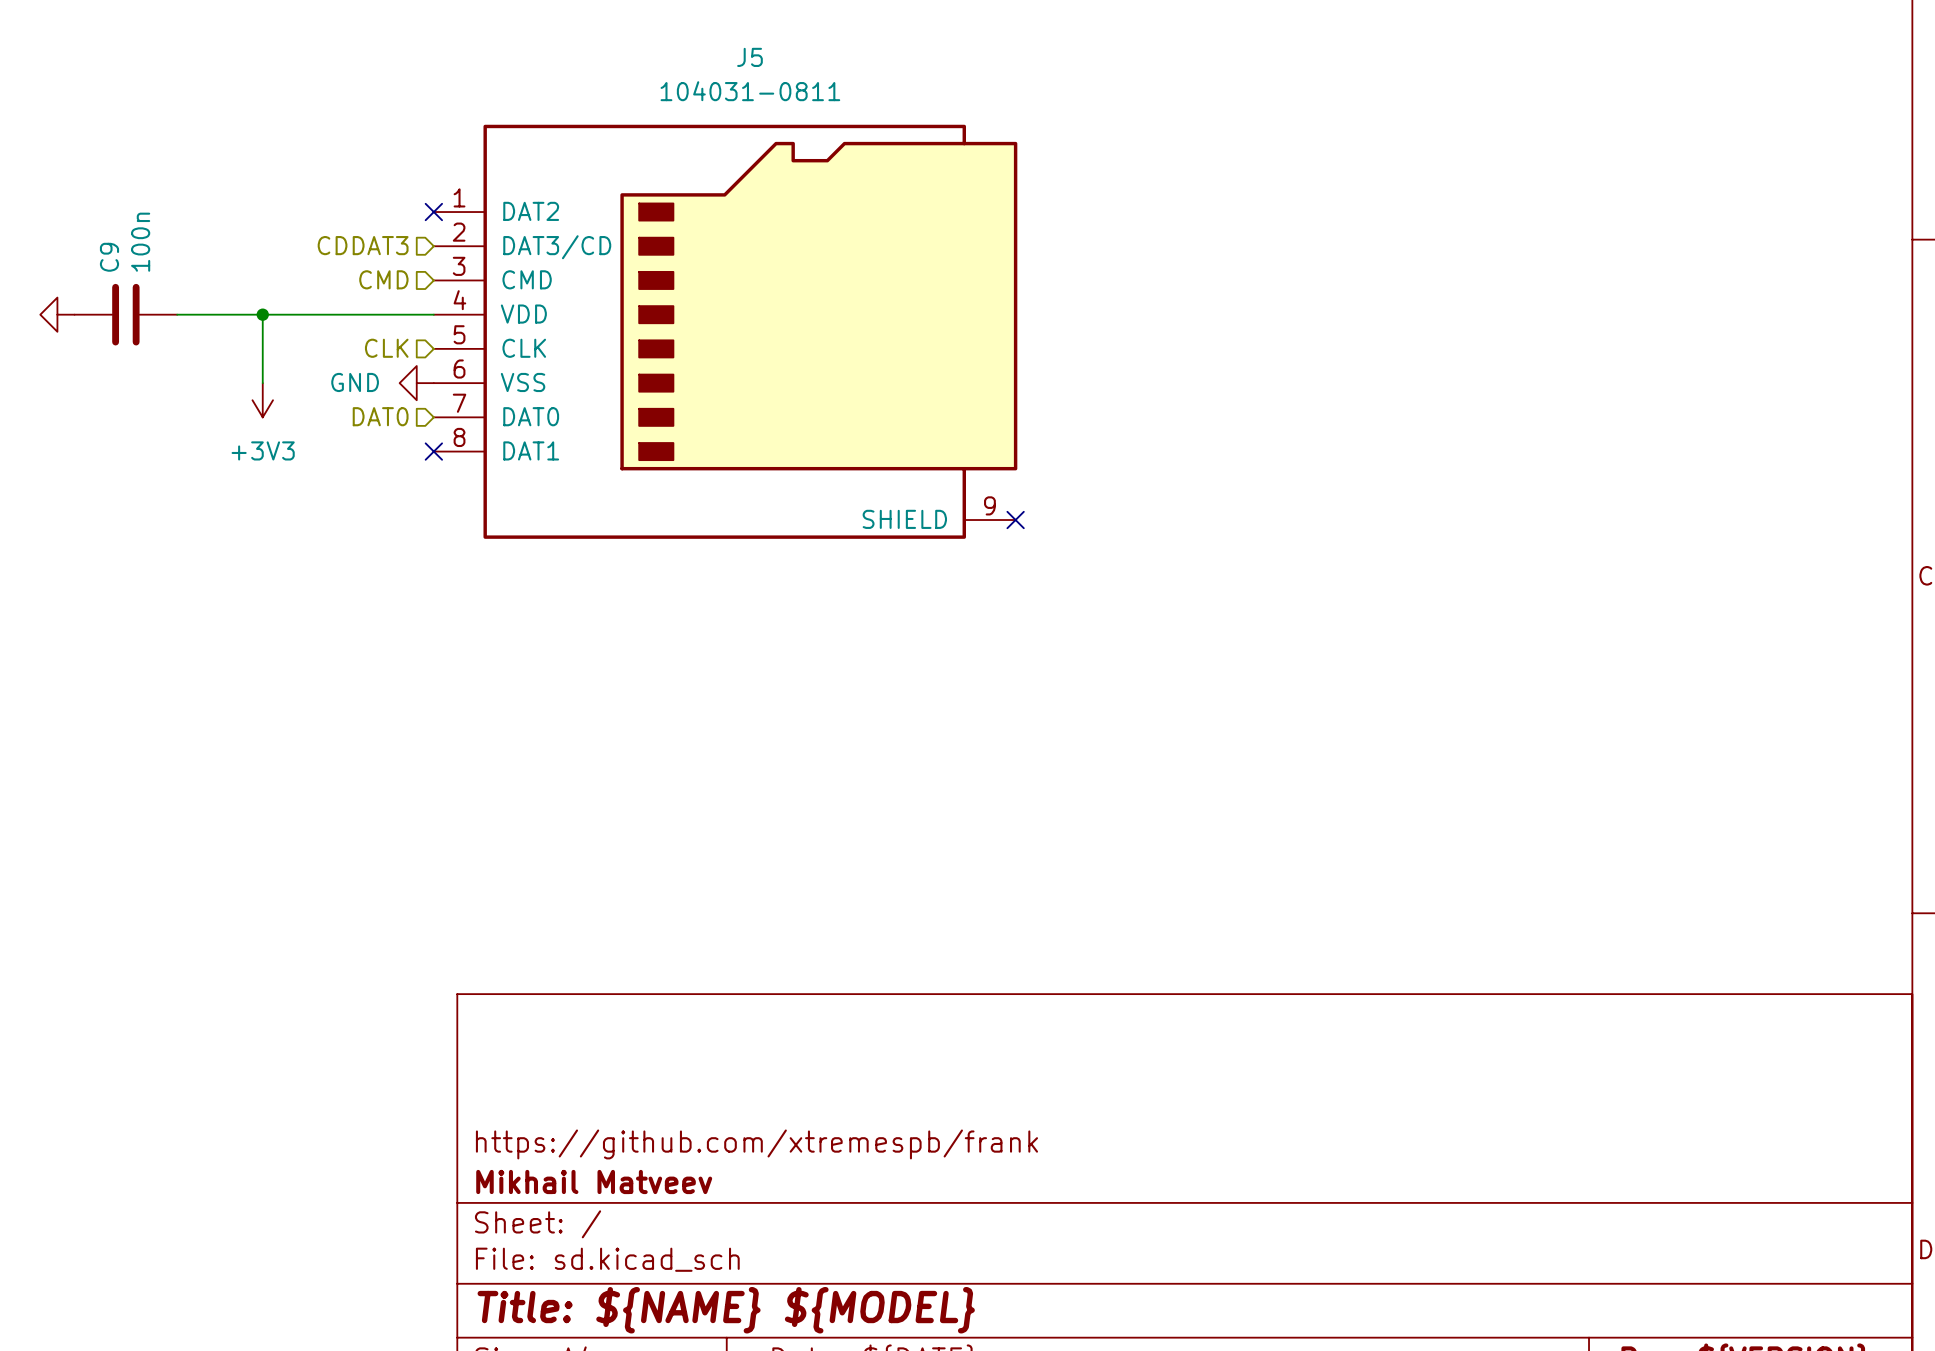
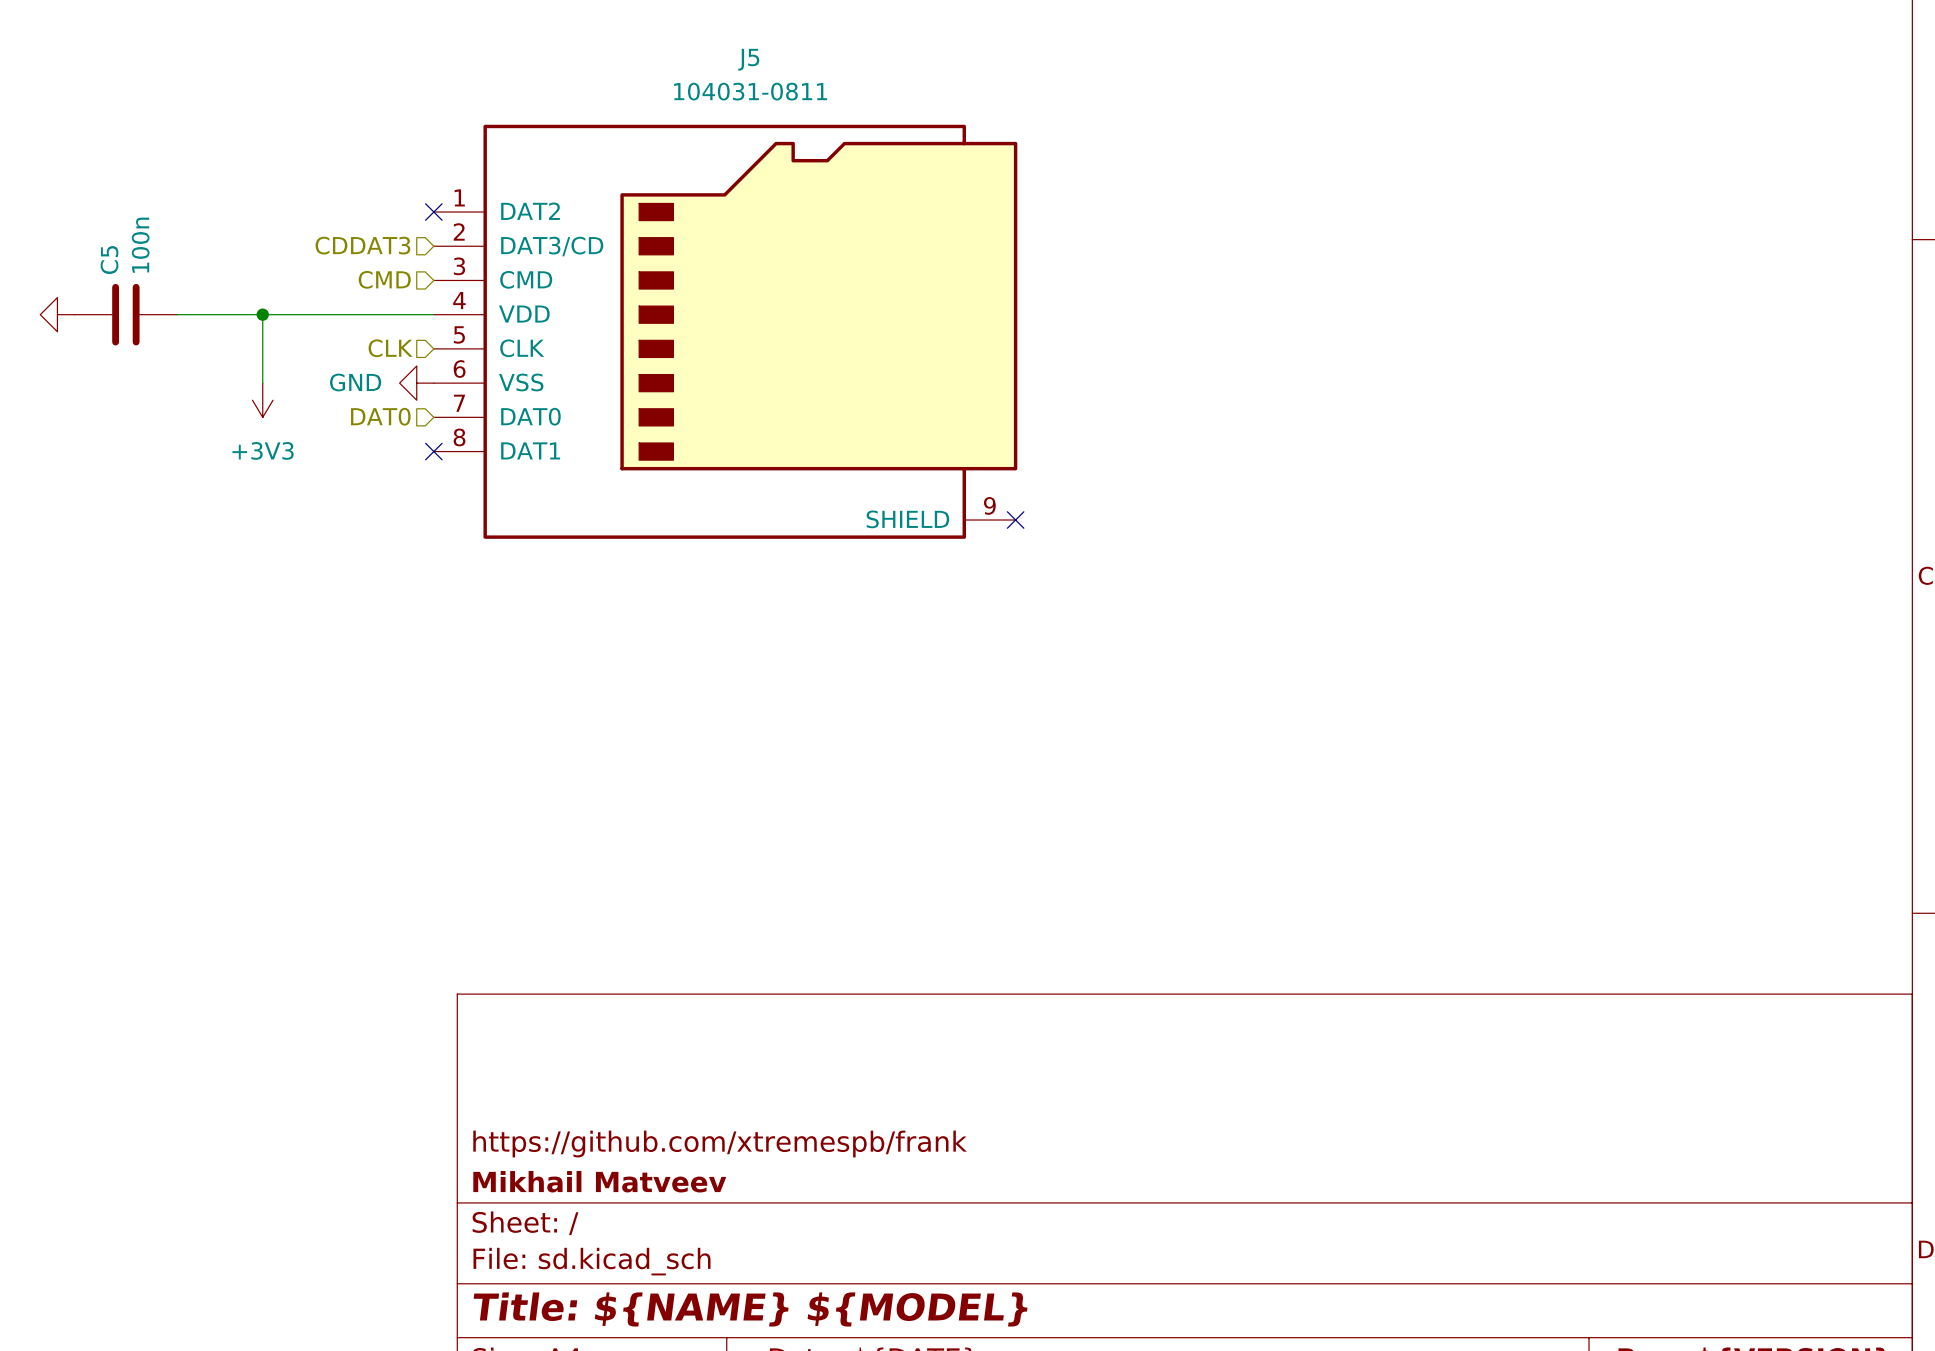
C9 name: C9 (109, 257) -> C5 (109, 260)

